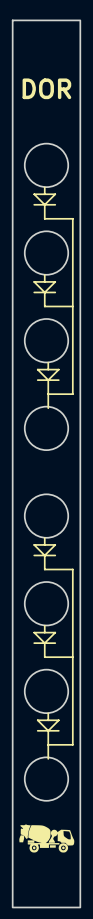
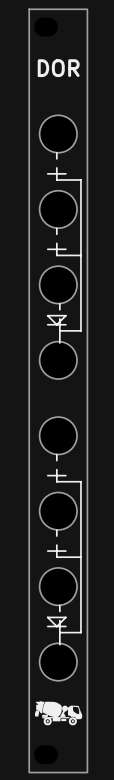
line: (34, 194) (55, 194) (44, 204) (34, 194) -> none
line: (34, 204) (55, 204) -> (47, 249) (65, 249)
line: (34, 281) (44, 292) (55, 281) (34, 281) -> (47, 315) (56, 324) (65, 315) (47, 315)
line: (34, 292) (55, 292) -> (47, 324) (65, 324)
line: (37, 369) (48, 380) (58, 369) (37, 369) -> none
line: (37, 380) (58, 380) -> (47, 173) (65, 173)
line: (34, 544) (44, 555) (55, 544) (34, 544) -> none
line: (34, 555) (55, 555) -> (47, 551) (65, 551)
line: (34, 632) (44, 643) (55, 632) (34, 632) -> (47, 617) (56, 626) (65, 617) (47, 617)
line: (34, 643) (55, 643) -> (47, 626) (65, 626)
line: (37, 720) (58, 720) (48, 730) (37, 720) -> none
line: (37, 730) (58, 730) -> (47, 475) (65, 475)

